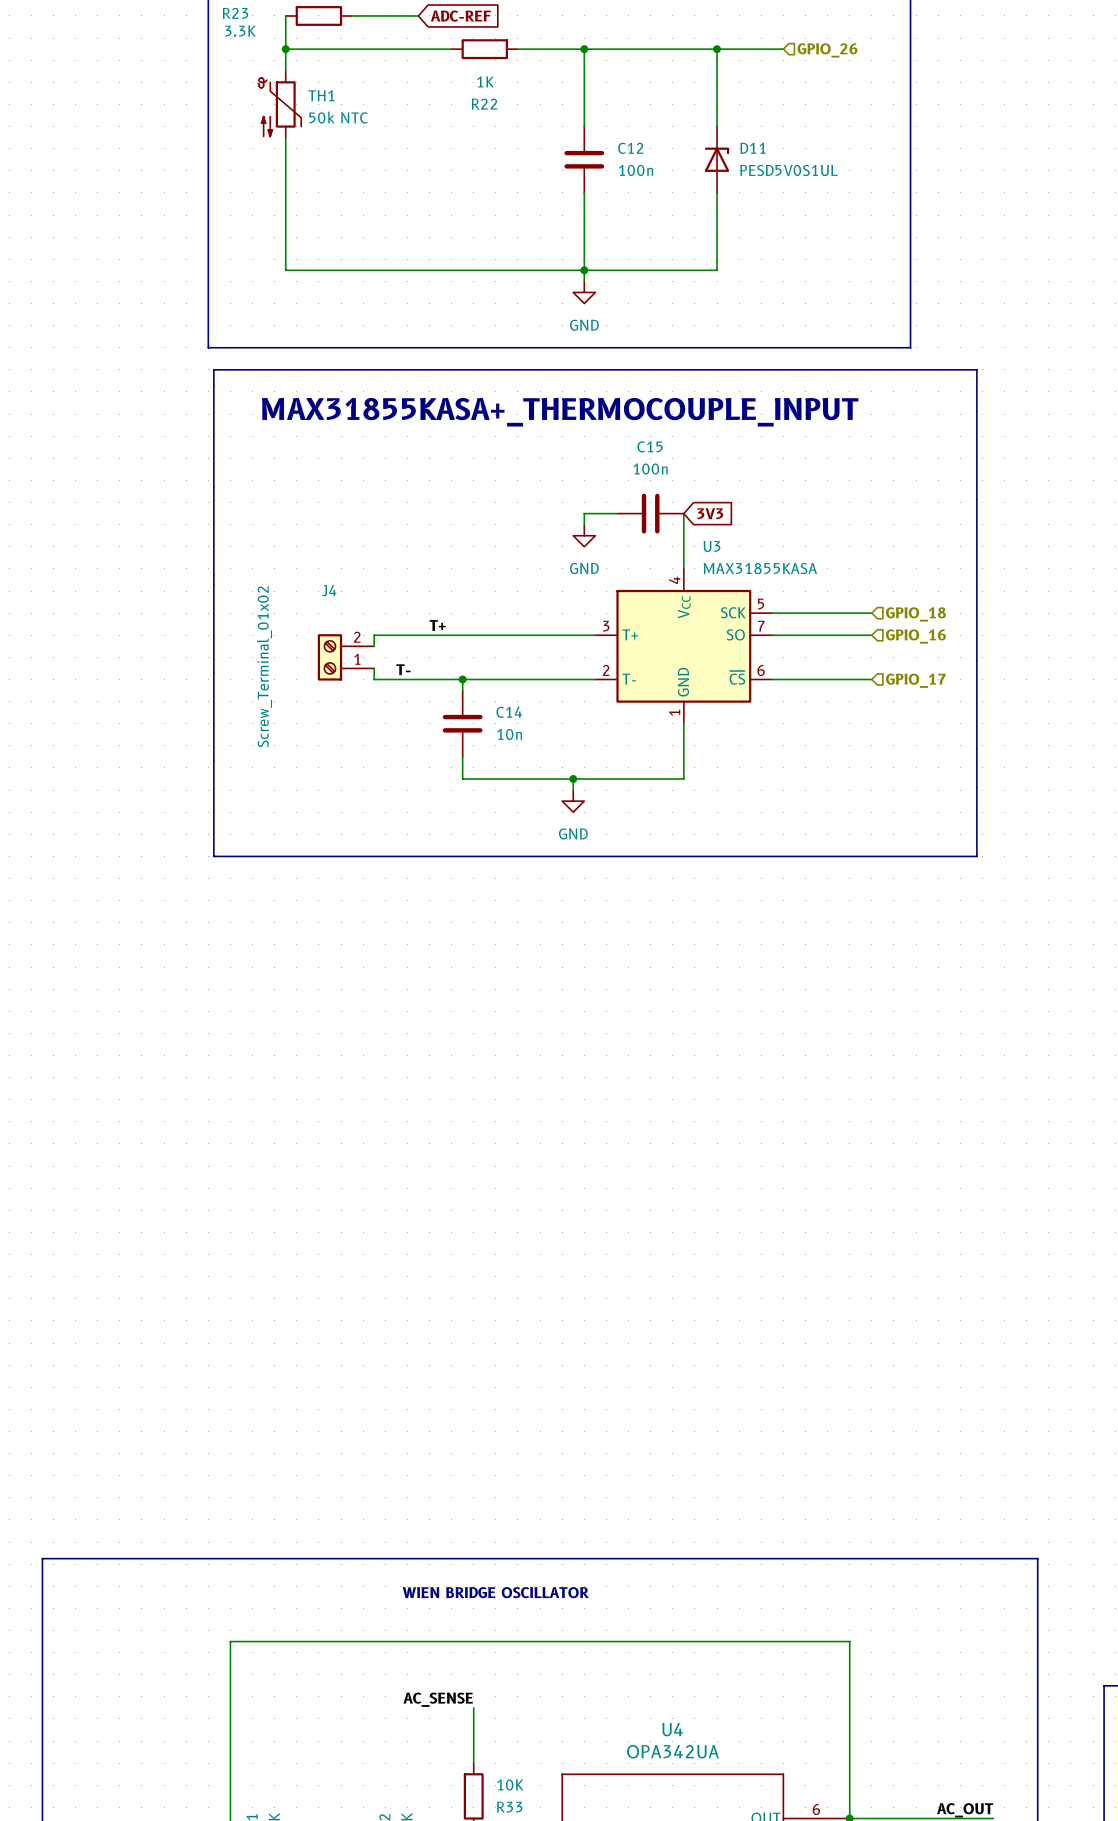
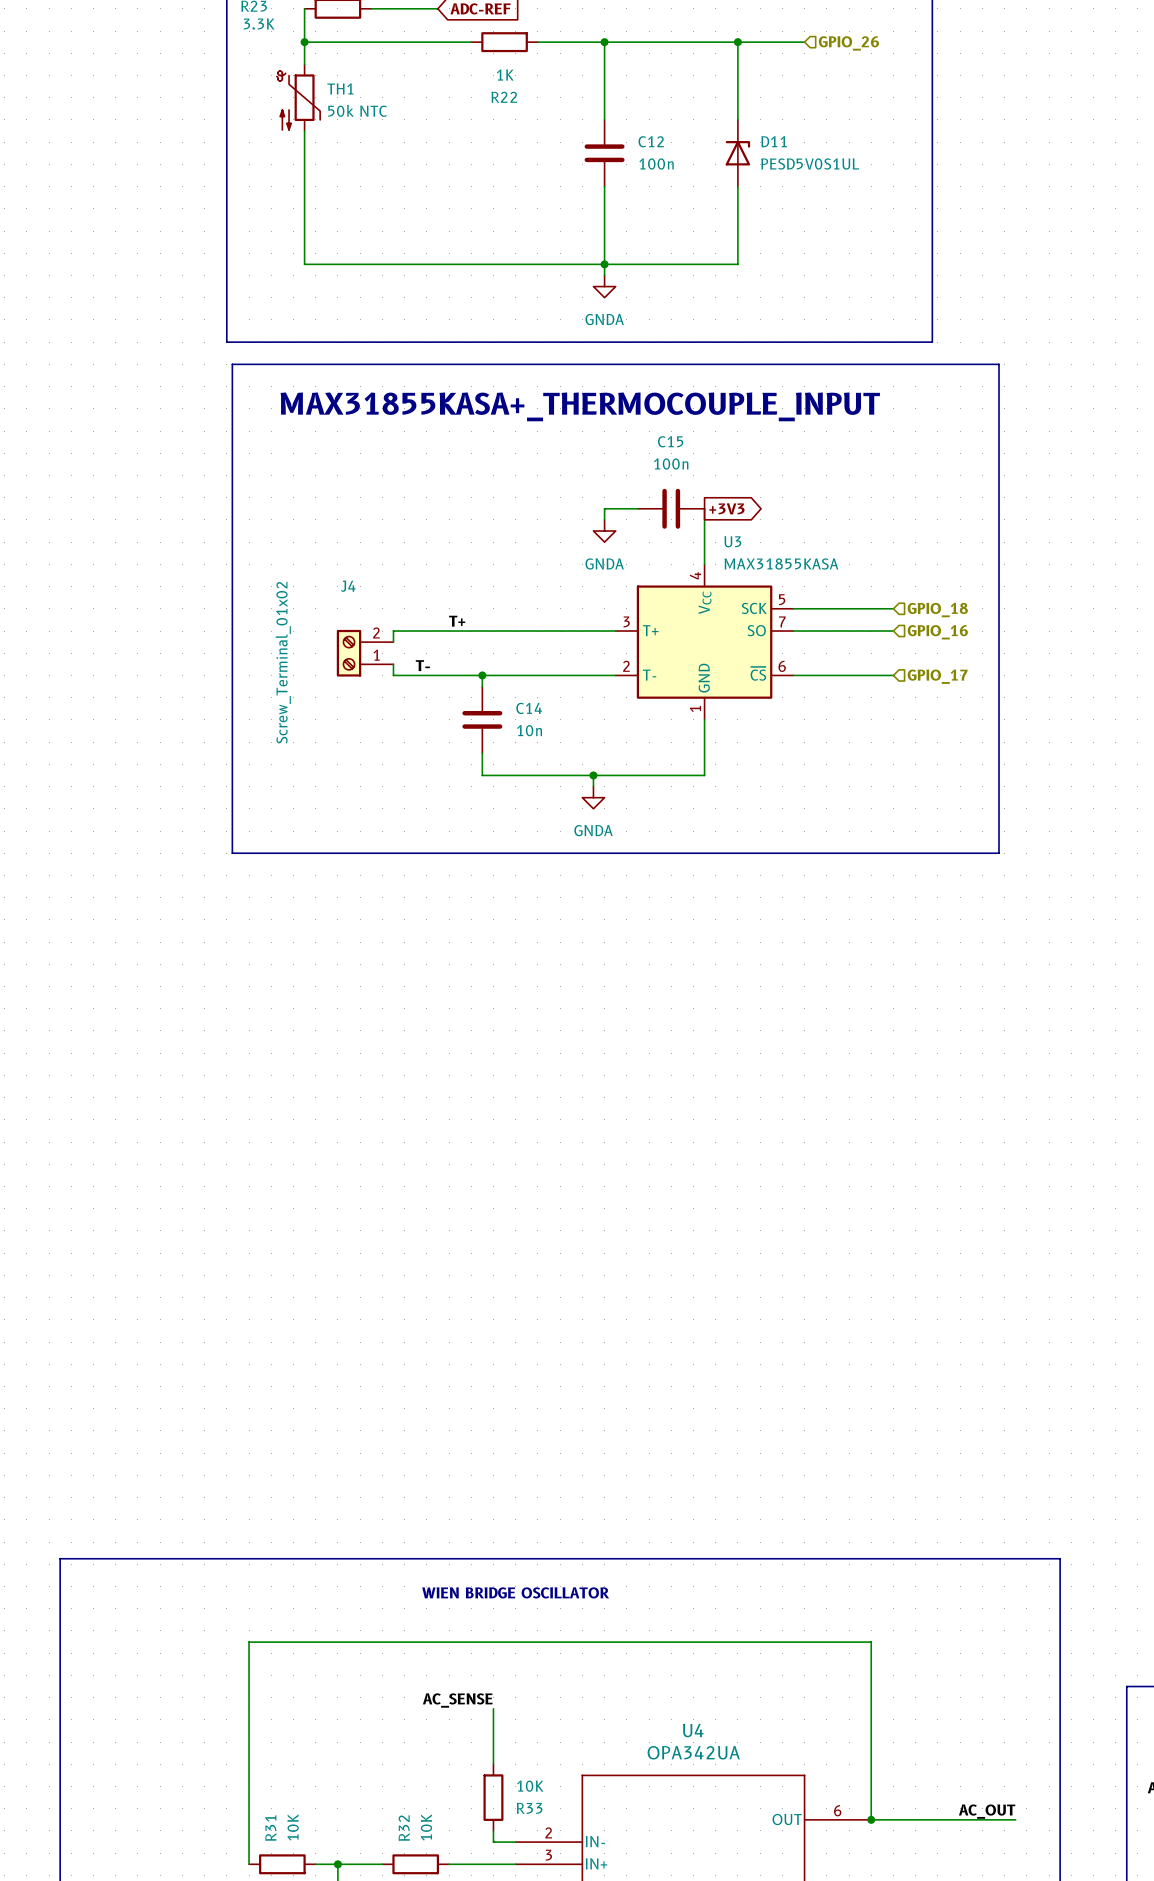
power symbol: GND (584, 292) -> GNDA (604, 286)
global label shape: input (710, 513) -> output (726, 508)
global label: 3V3 (710, 513) -> +3V3 (726, 508)
power symbol: GND (584, 535) -> GNDA (604, 531)
power symbol: GND (573, 801) -> GNDA (593, 797)

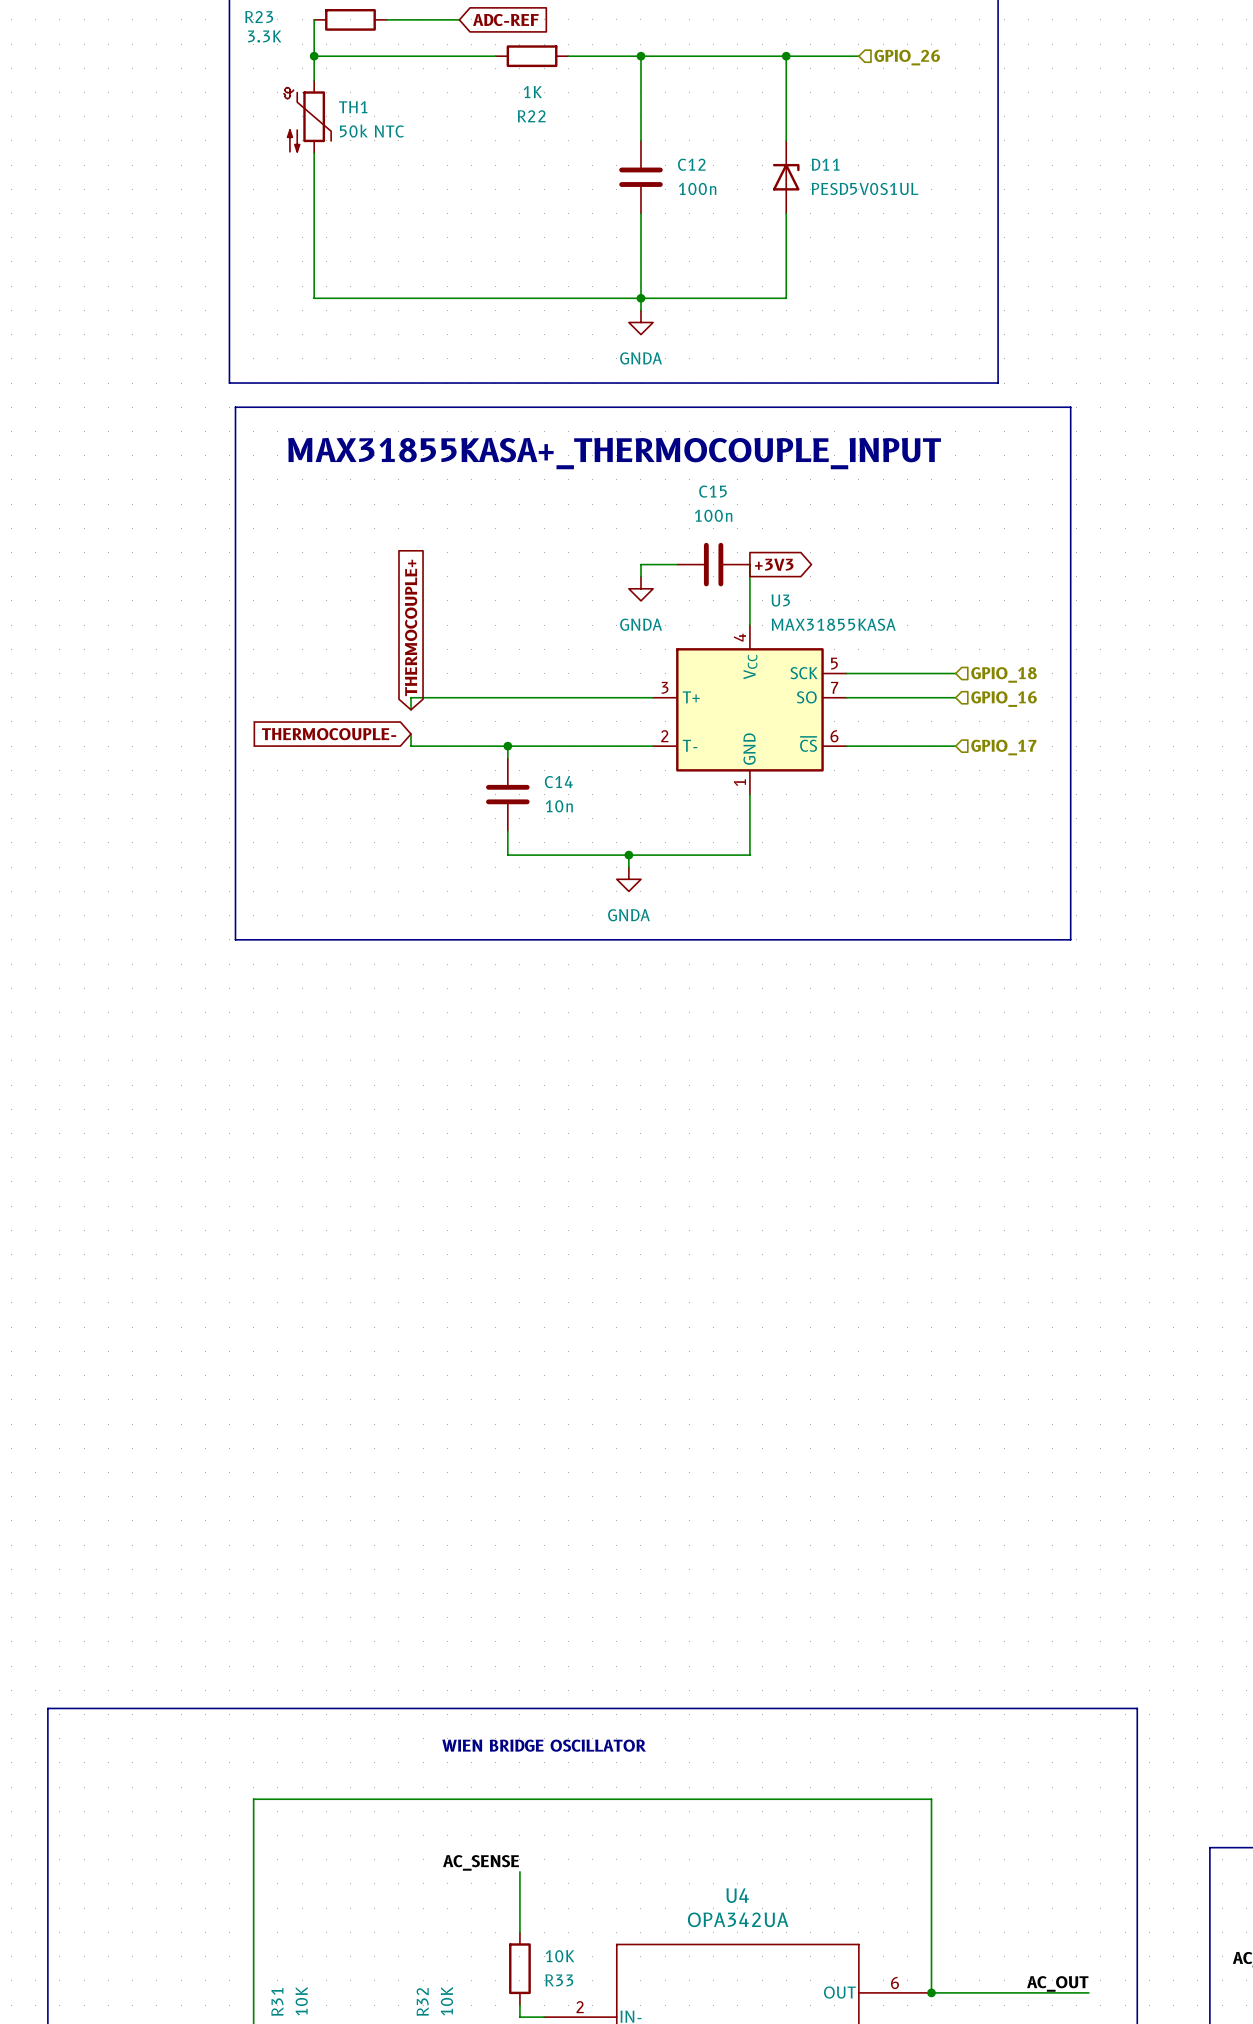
global label: none -> THERMOCOUPLE+ (411, 627)
label: T+ (457, 621) -> none
J4: Screw_Terminal_01x02 (365, 653) -> none
global label: none -> THERMOCOUPLE- (329, 734)
label: T- (422, 665) -> none

